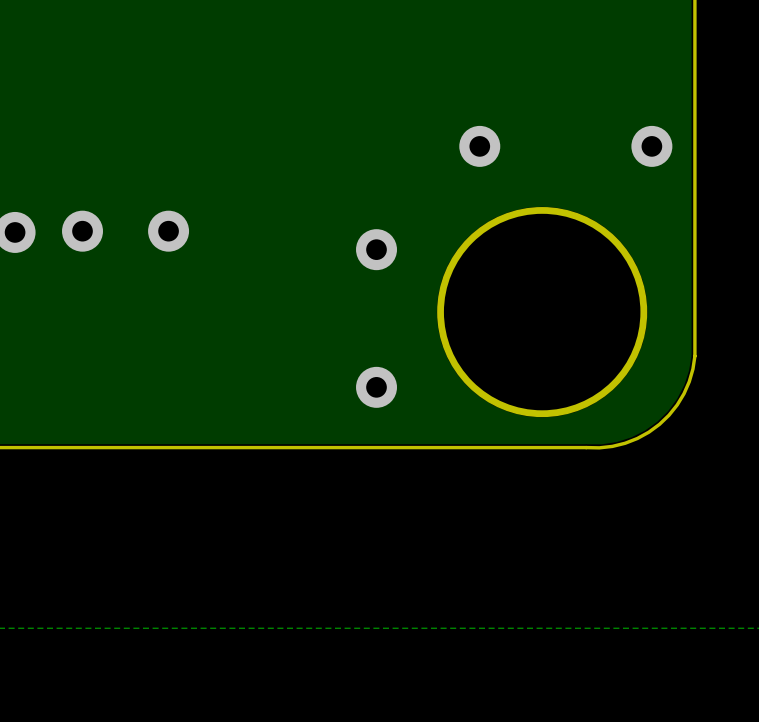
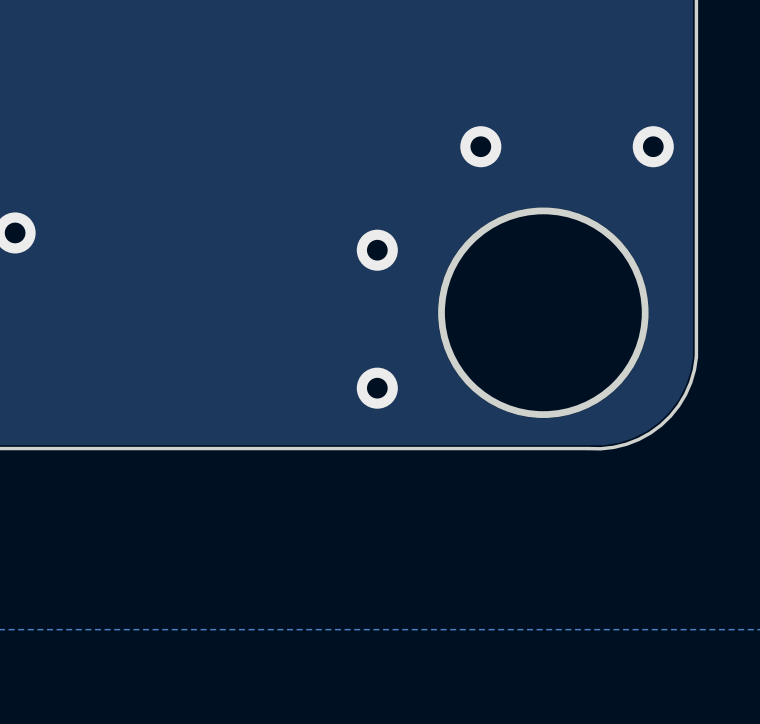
via: (82, 231) -> none
via: (168, 231) -> none

